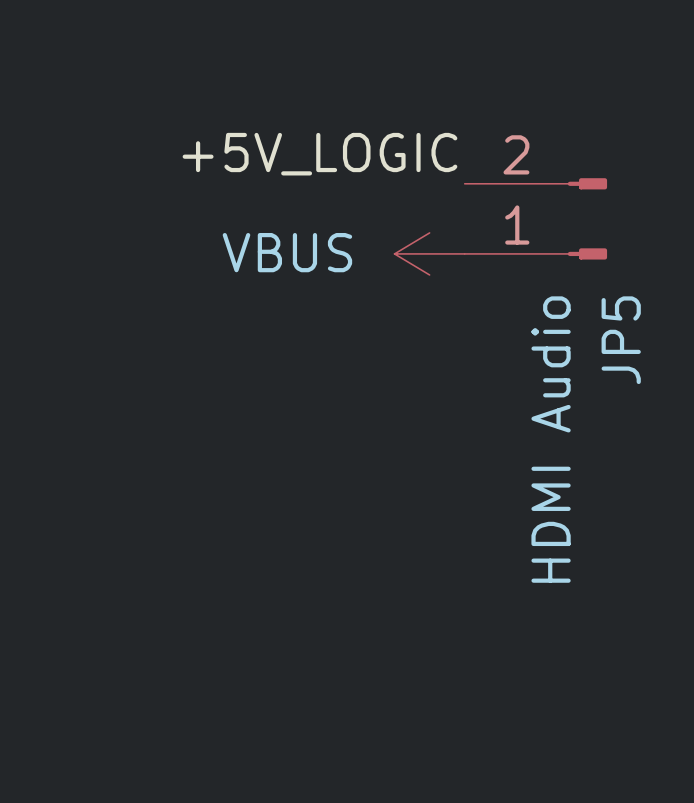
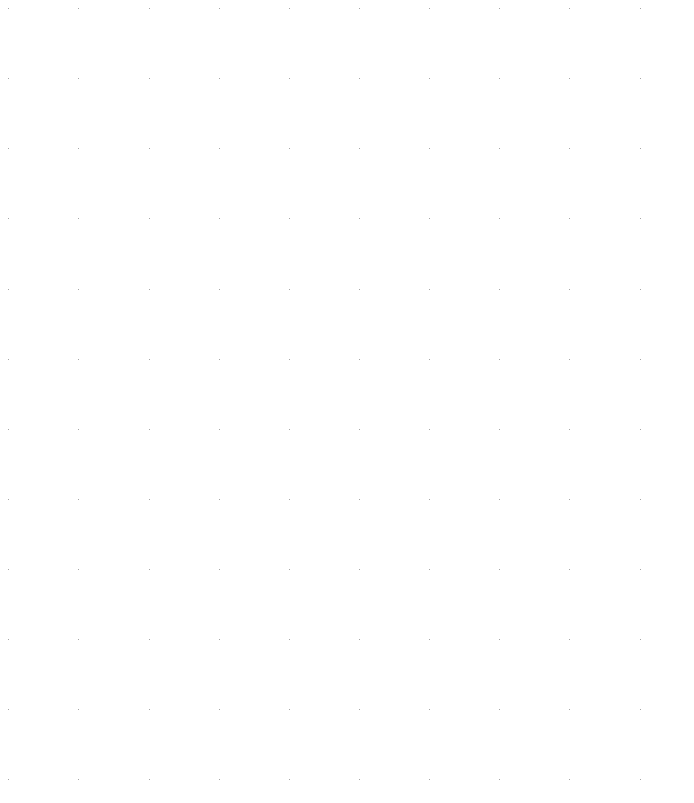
label: +5V_LOGIC (319, 154) -> none
JP5: HDMI Audio (535, 218) -> none
power symbol: VBUS (429, 253) -> none

